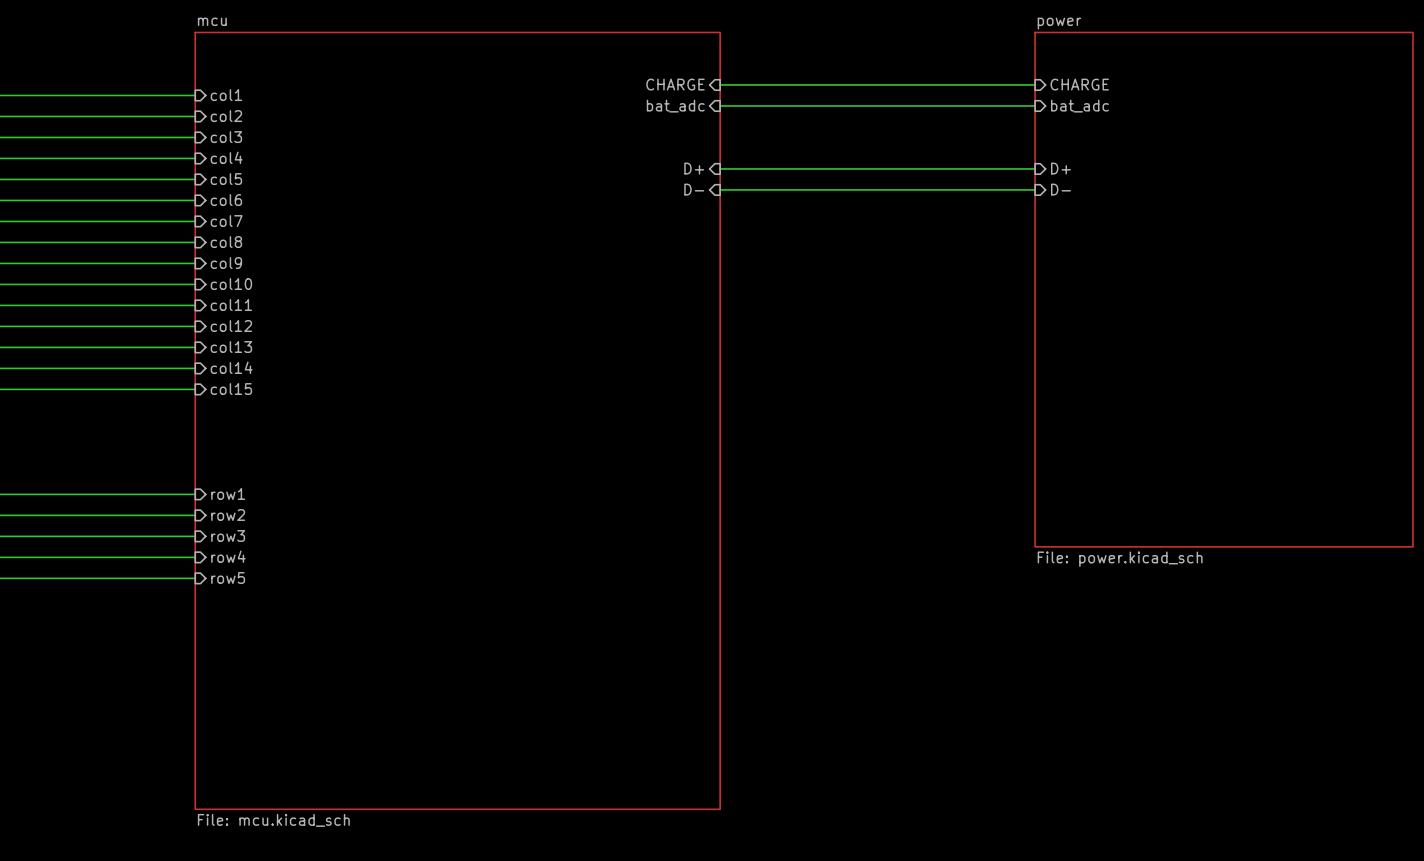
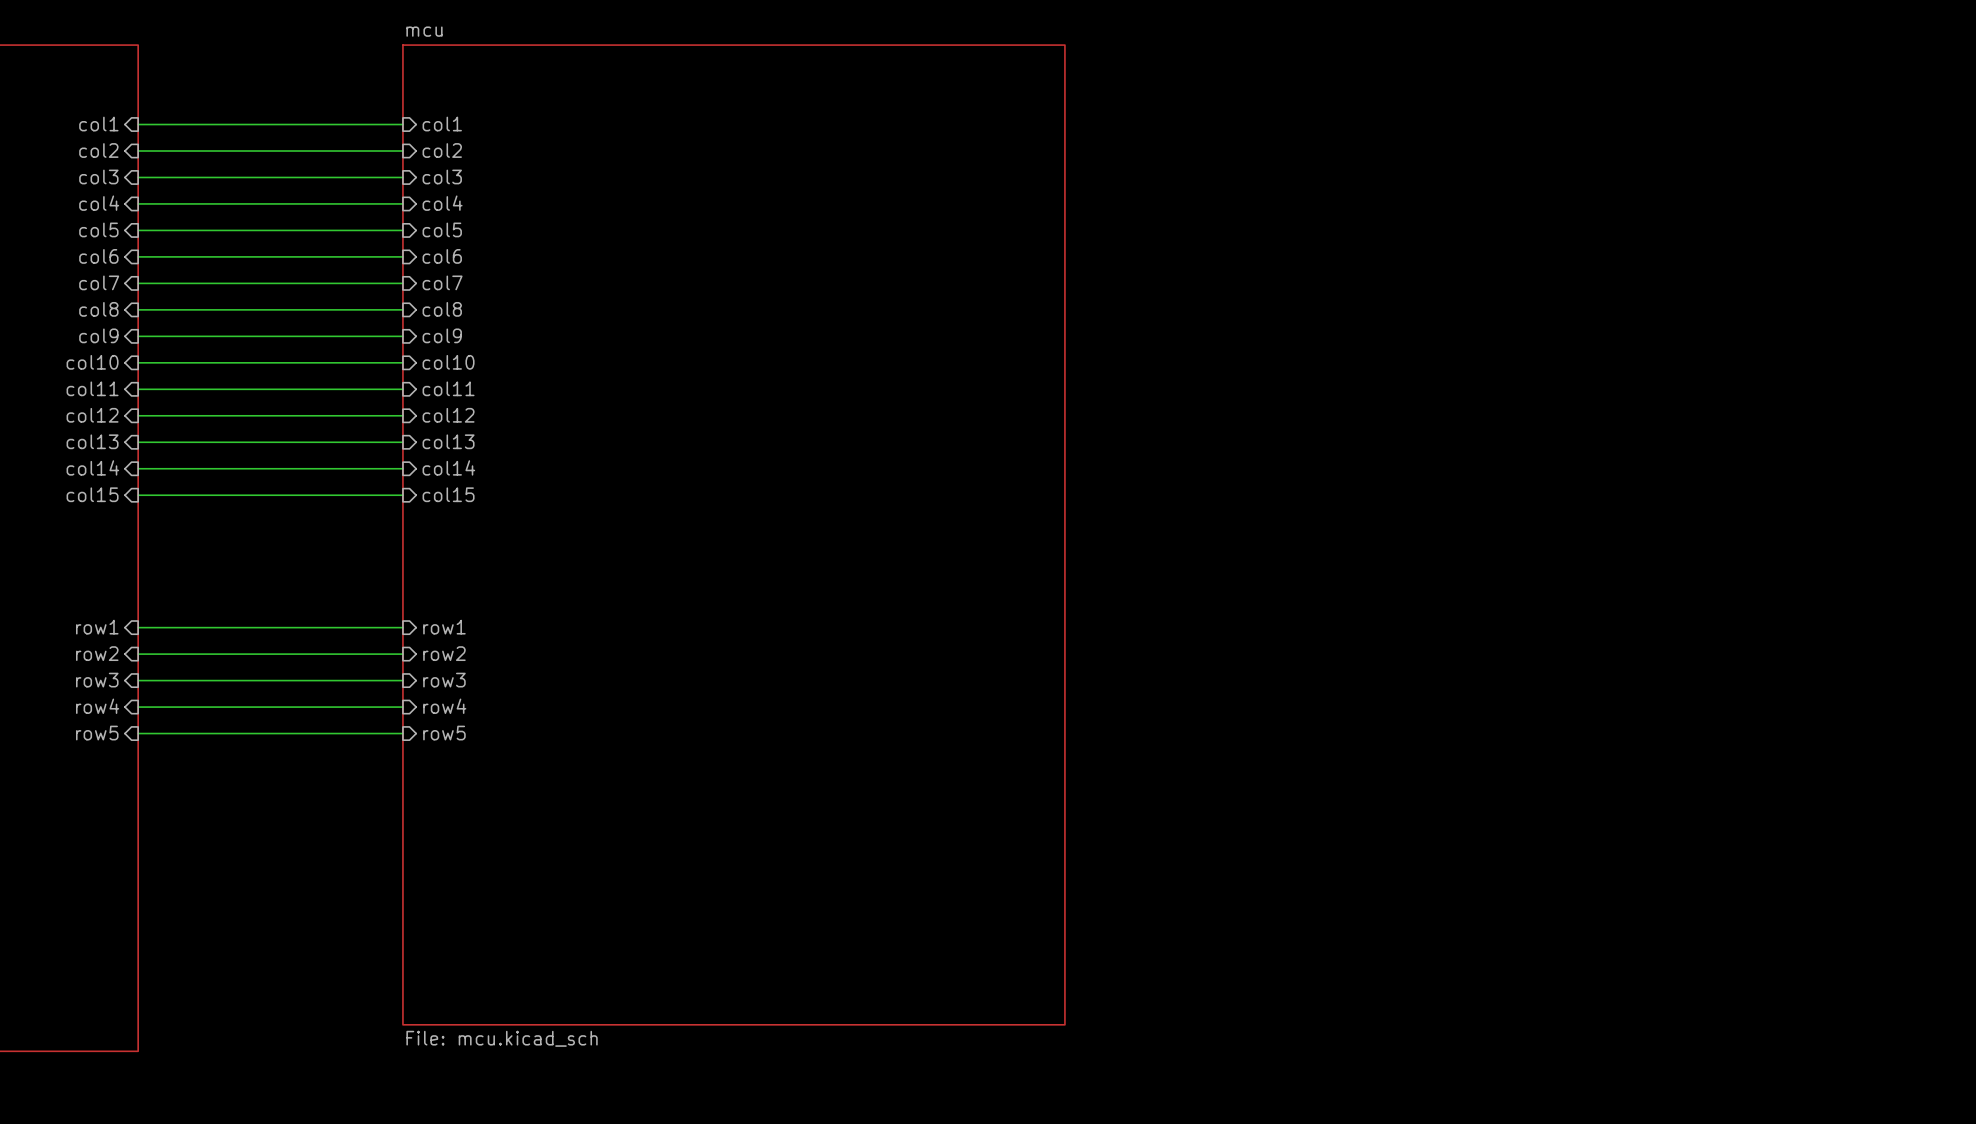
sheet pin: CHARGE (675, 84) -> none
wire: (720, 84) (1035, 84) -> none
sheet pin: CHARGE (1079, 84) -> none
wire: (720, 105) (1035, 105) -> none
sheet pin: bat_adc (675, 106) -> none
sheet pin: bat_adc (1079, 106) -> none
sheet pin: D+ (694, 168) -> none
wire: (720, 168) (1035, 168) -> none
sheet pin: D+ (1060, 168) -> none
sheet pin: D- (694, 189) -> none
wire: (720, 189) (1035, 189) -> none
sheet pin: D- (1060, 189) -> none
sheet power: File: power.kicad_sch (1224, 289) -> none

